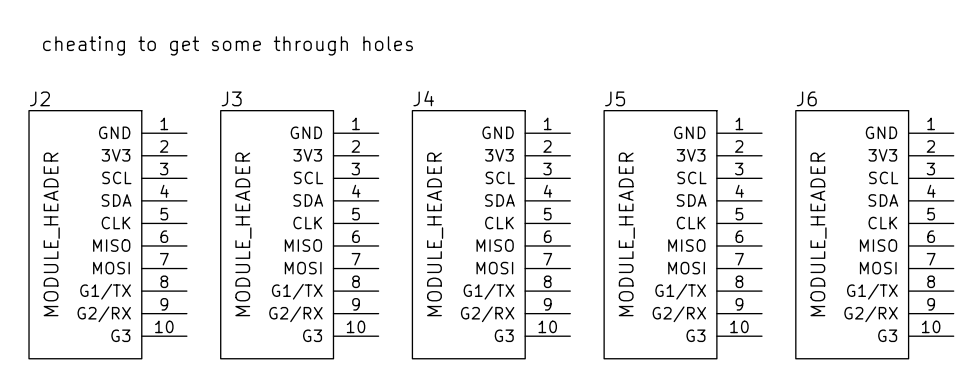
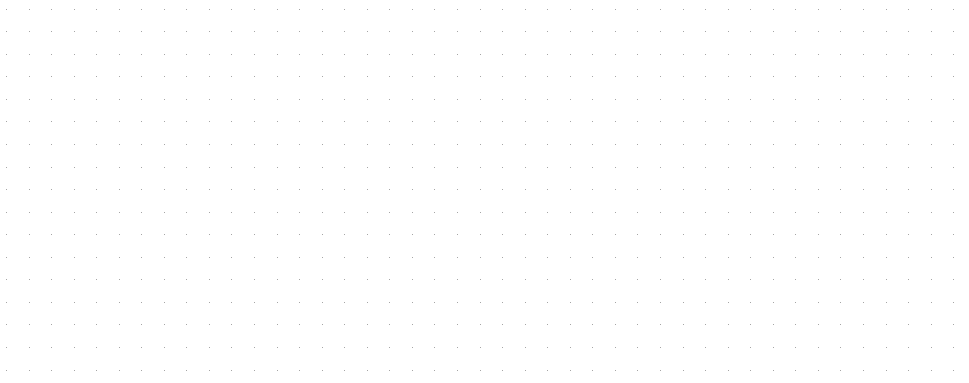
text: cheating to get some through holes (228, 45) -> none
J2: MODULE_HEADER (107, 234) -> none
J3: MODULE_HEADER (299, 234) -> none
J4: MODULE_HEADER (491, 234) -> none
J5: MODULE_HEADER (683, 234) -> none
J6: MODULE_HEADER (874, 234) -> none

